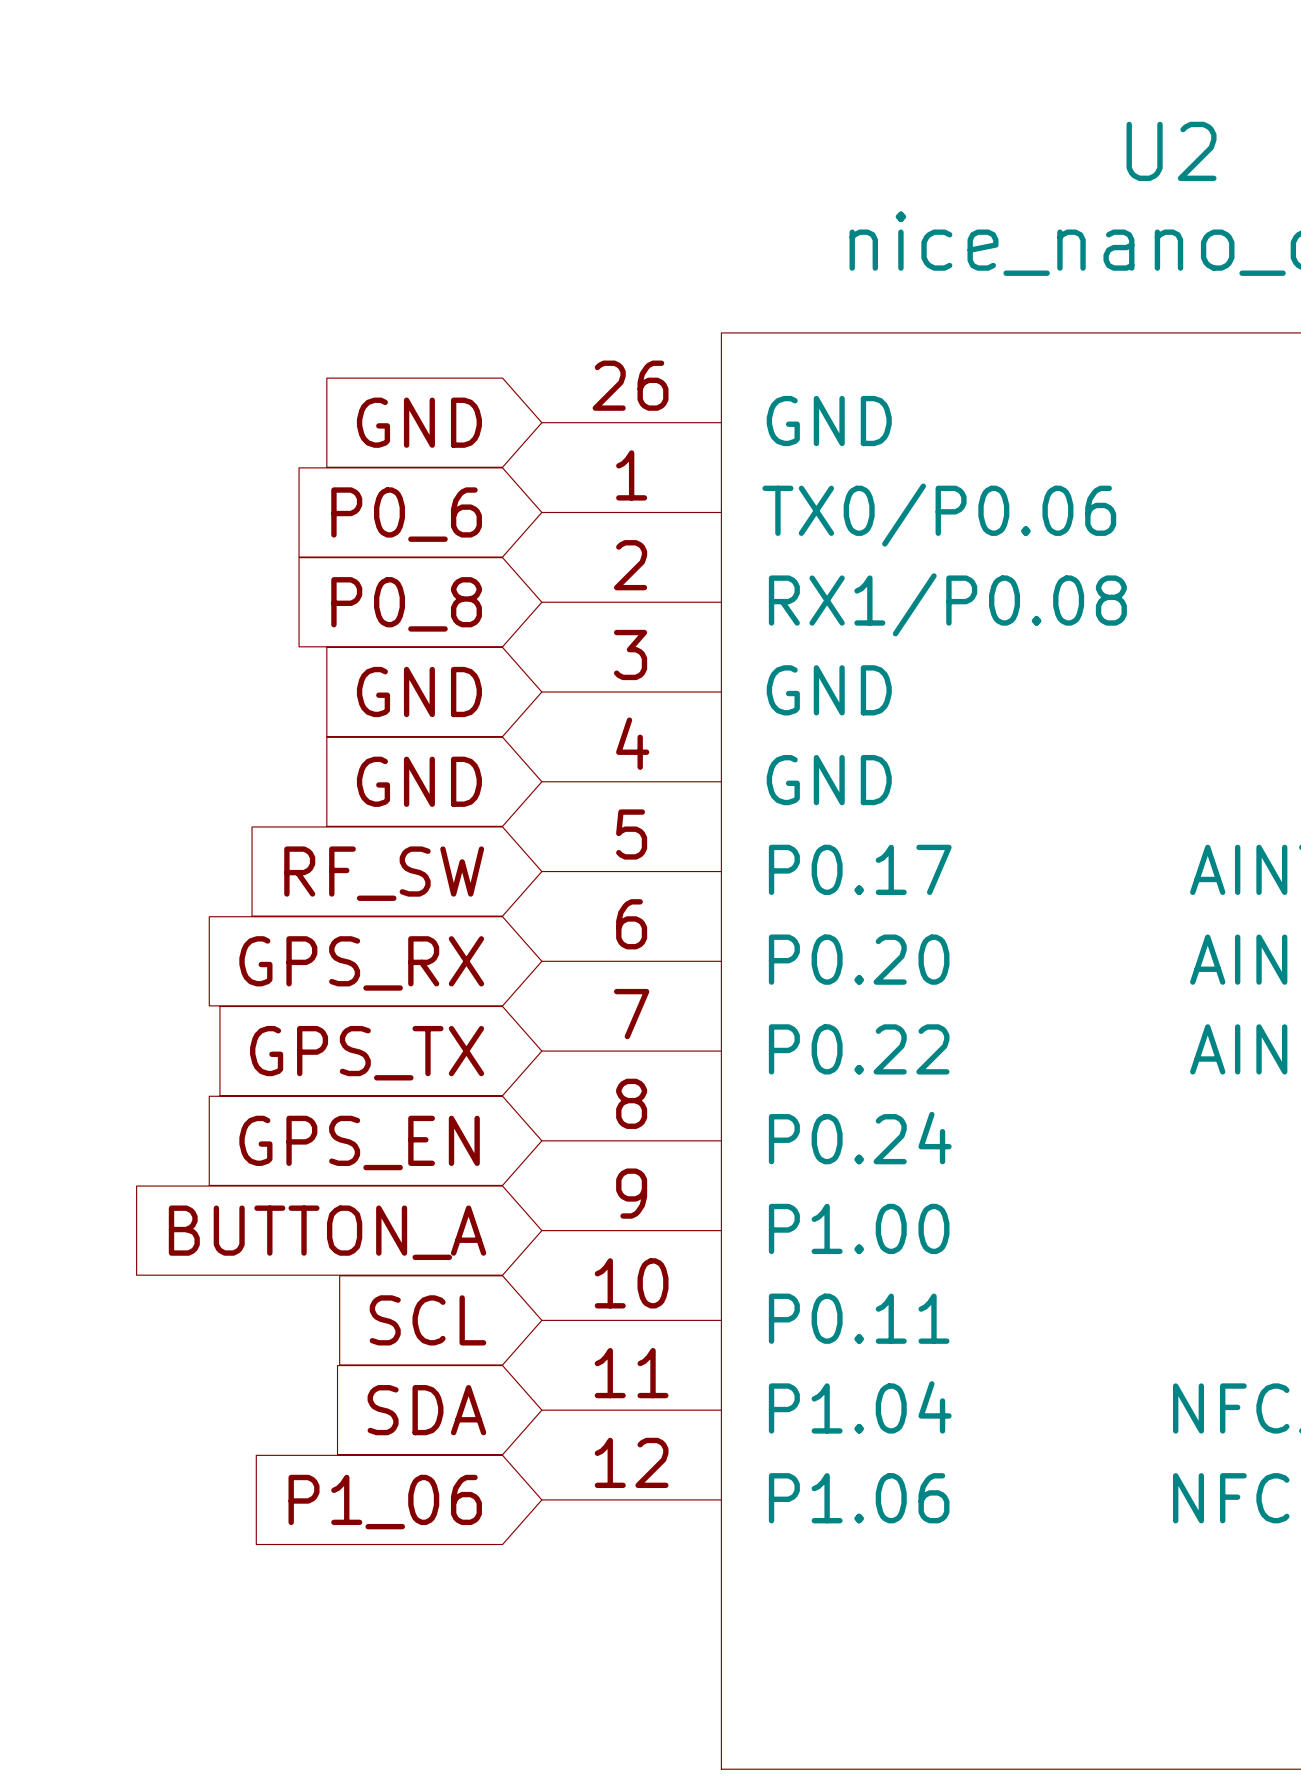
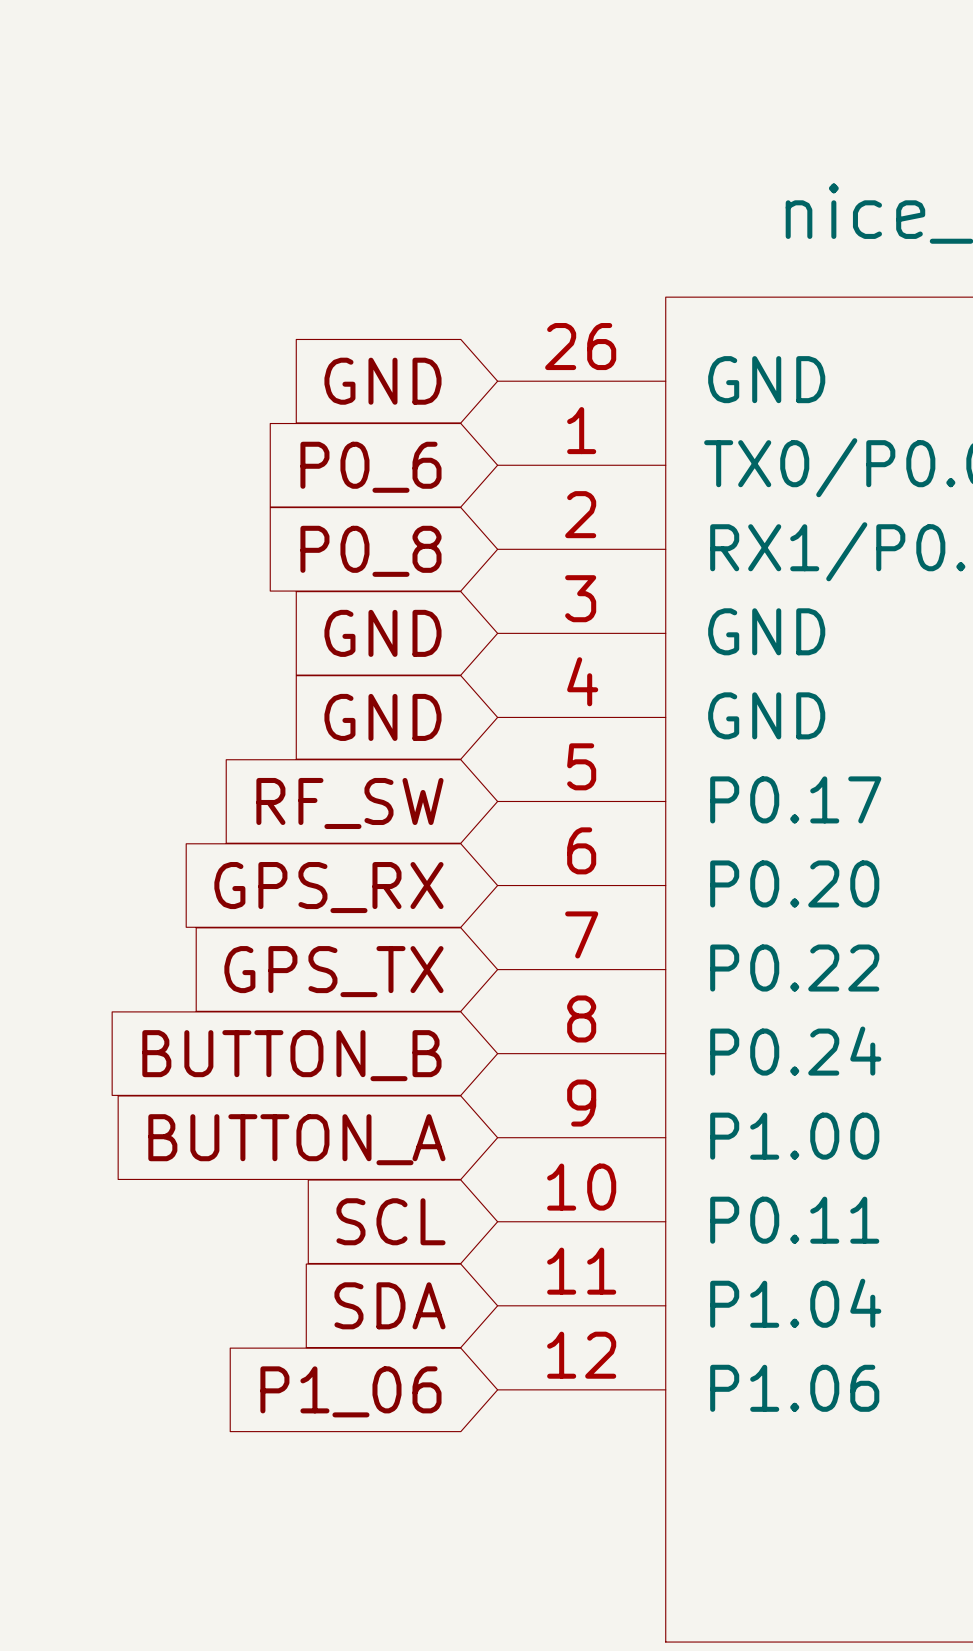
global label: GPS_EN (359, 1142) -> BUTTON_B (291, 1055)

